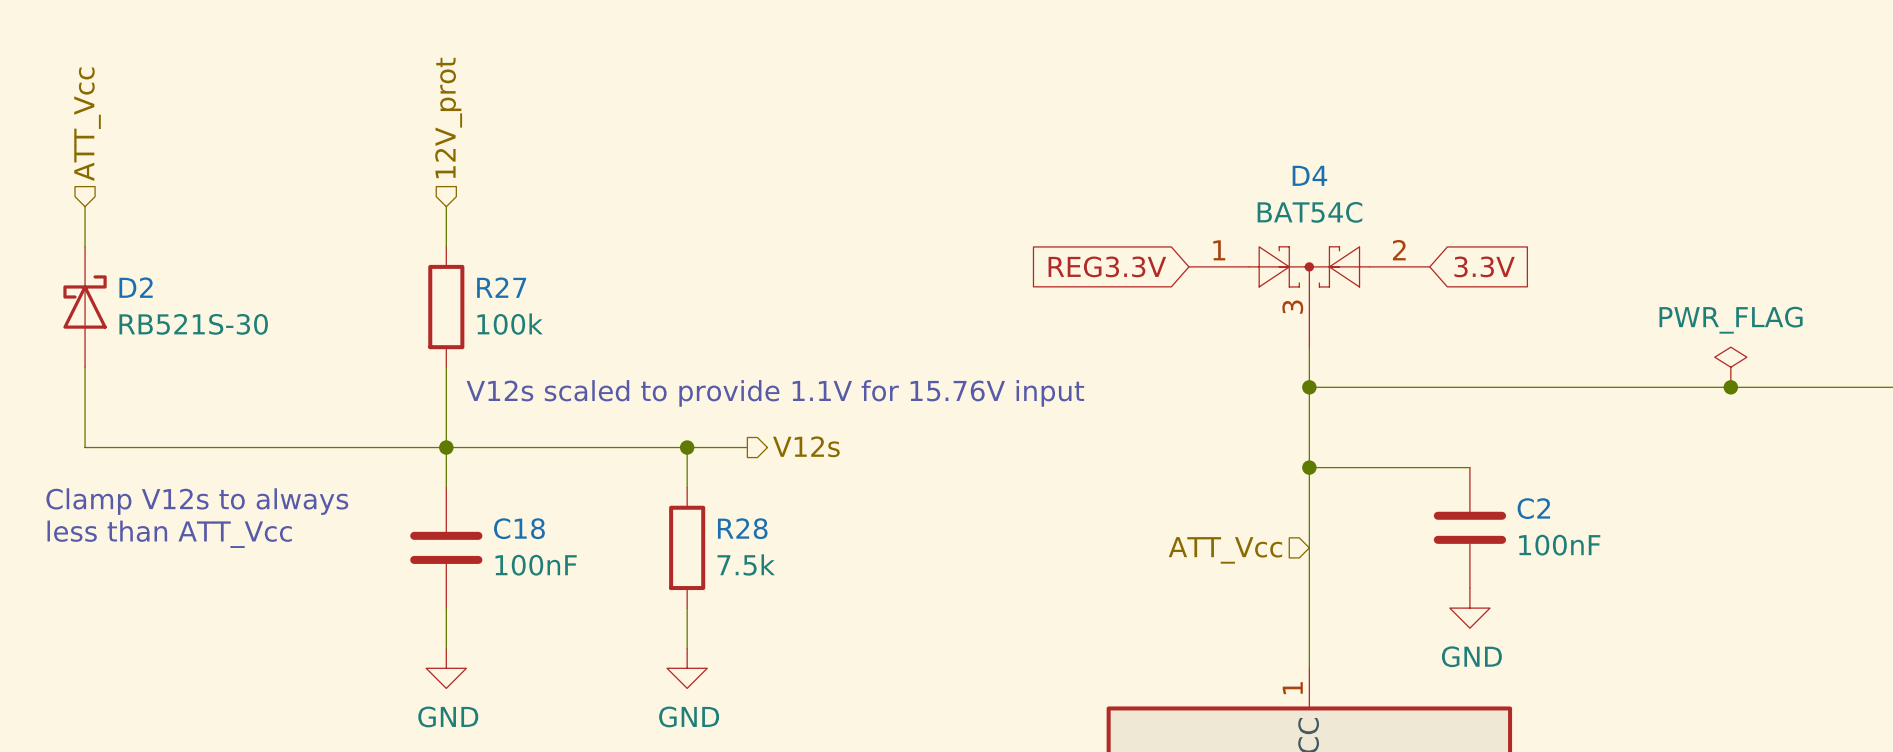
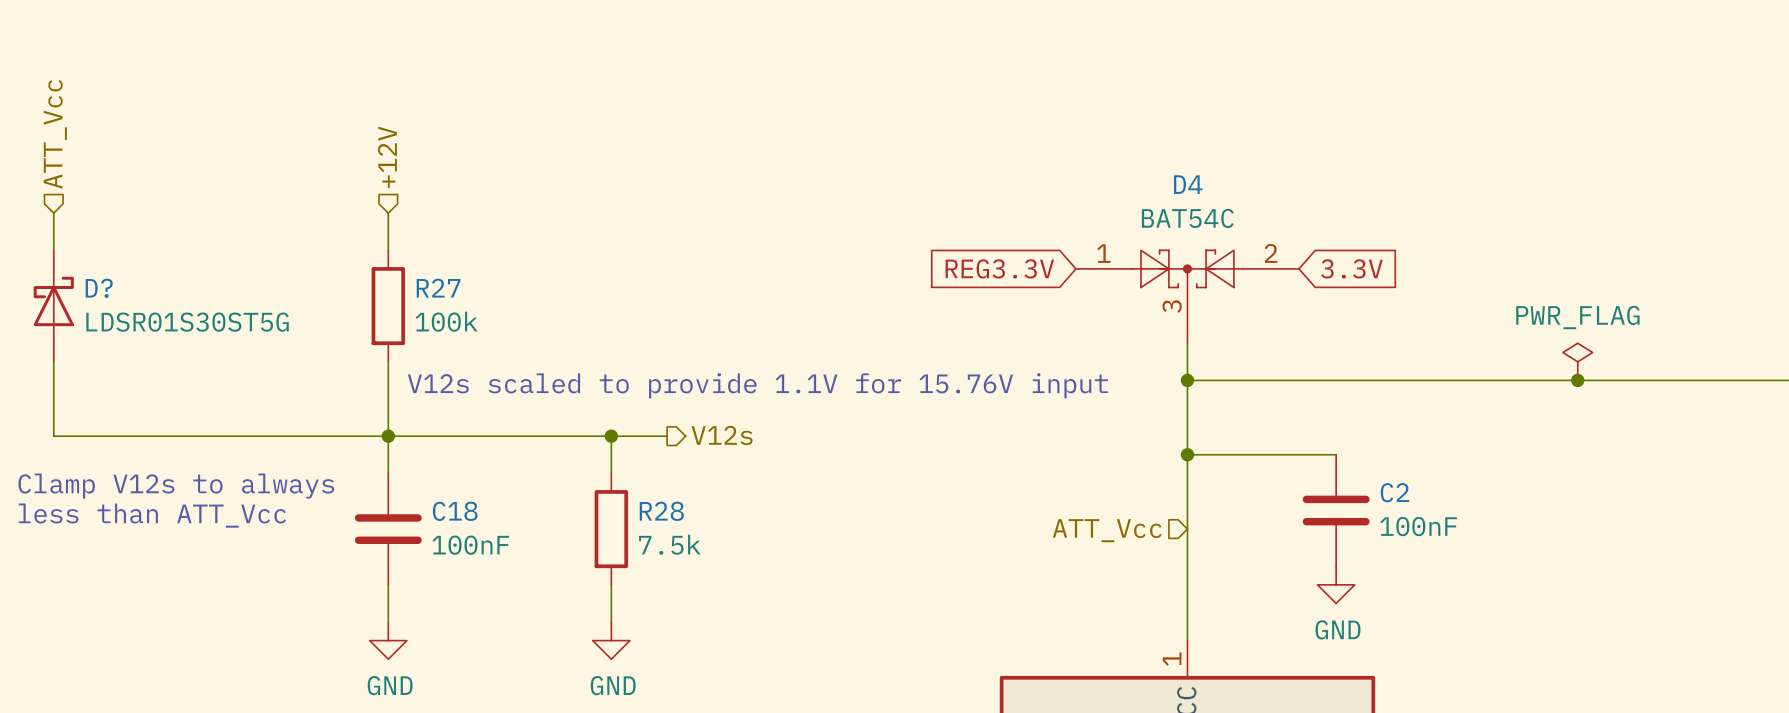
hierarchical label: 12V_prot (448, 117) -> +12V (387, 157)
D2 name: D2 (136, 287) -> D? (99, 288)
D2 value: RB521S-30 (193, 324) -> LDSR01S30ST5G (187, 322)

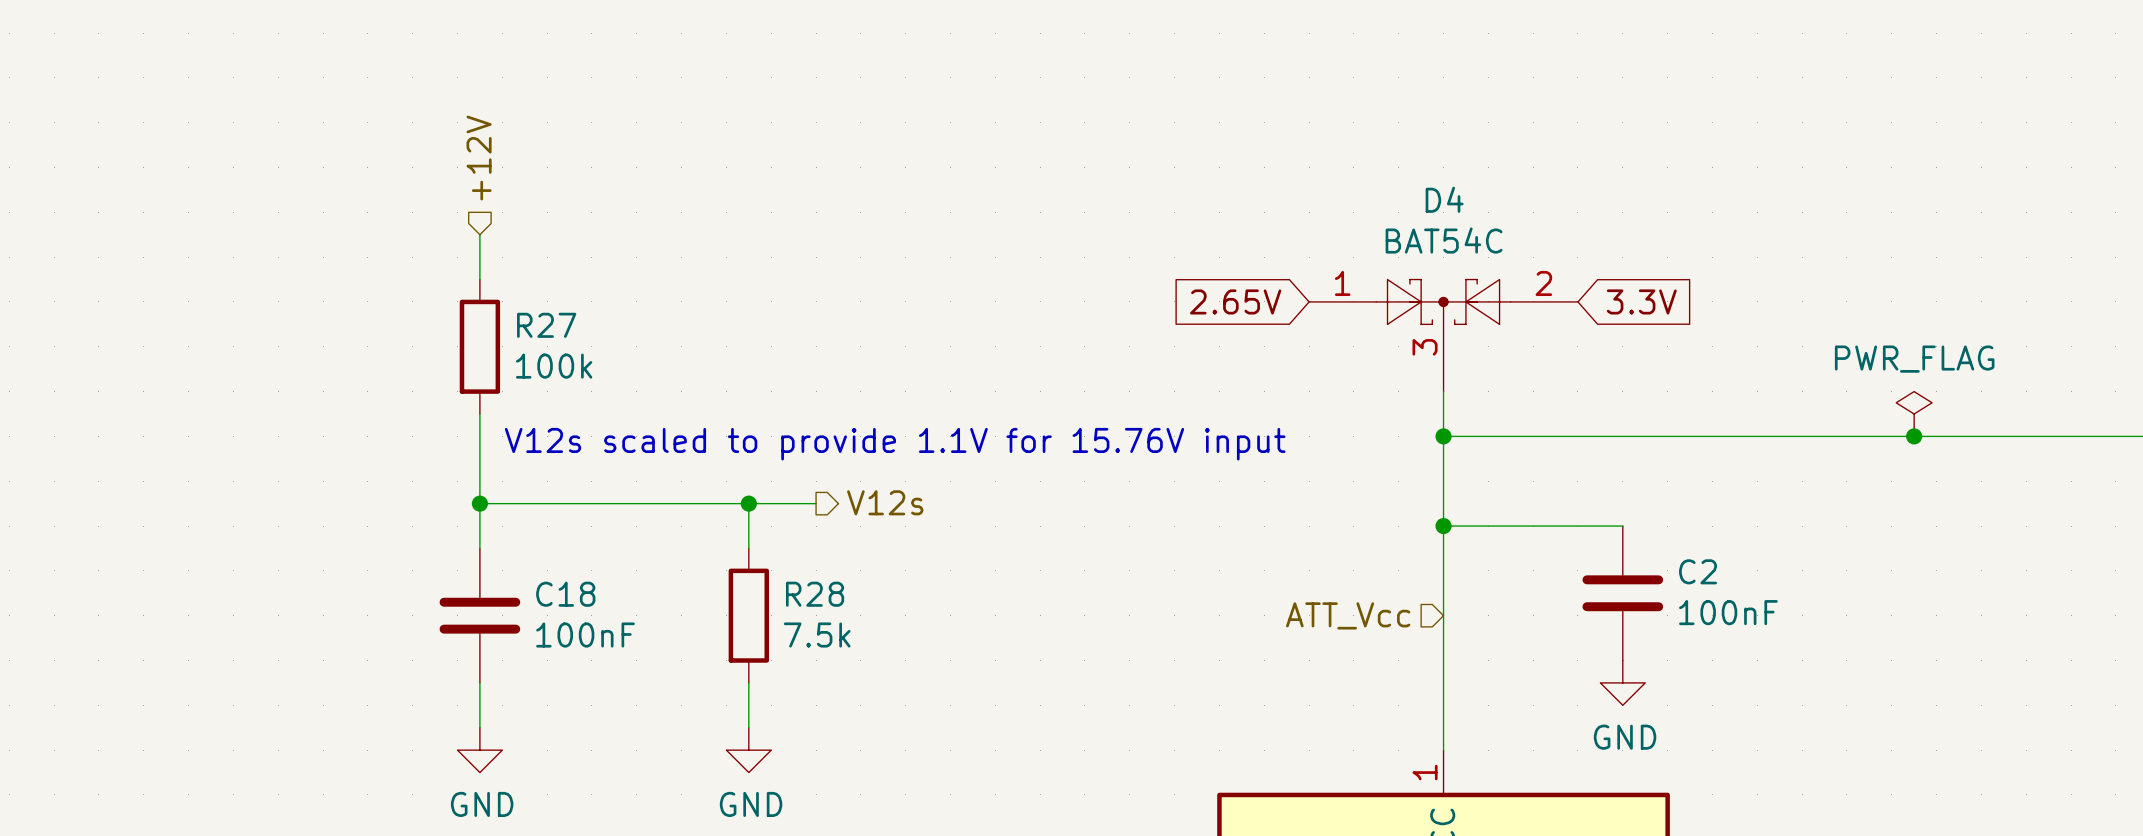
hierarchical label: ATT_Vcc (55, 134) -> none
wire: (53, 213) (53, 250) -> none
global label: REG3.3V (999, 268) -> 2.65V (1235, 301)
D?: LDSR01S30ST5G (53, 306) -> none
wire: (53, 361) (53, 436) (388, 436) -> none
text: Clamp V12s to always (176, 486) -> none
text: less than ATT_Vcc (152, 515) -> none

